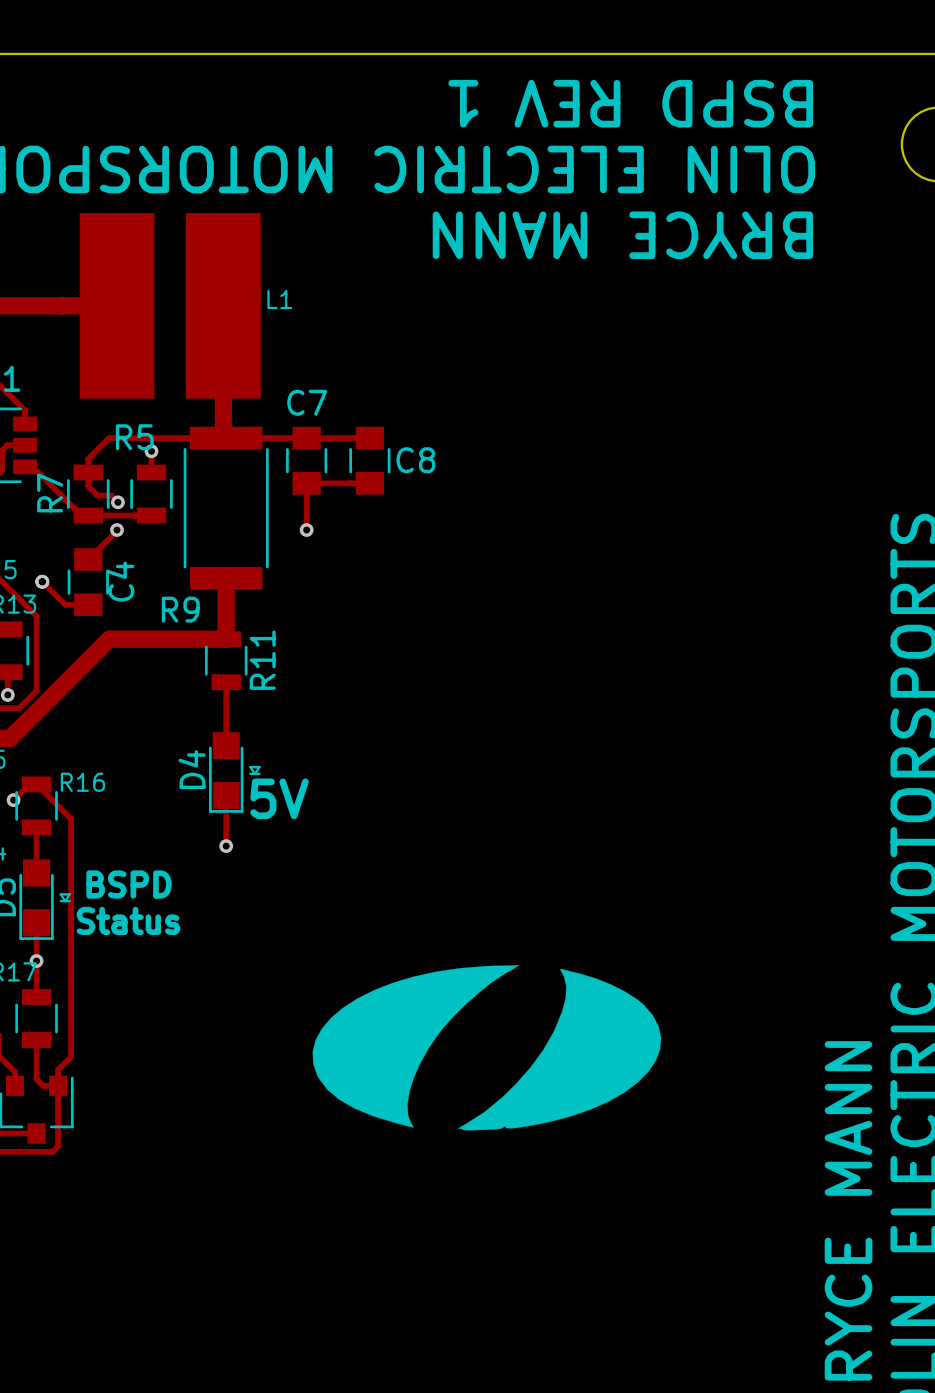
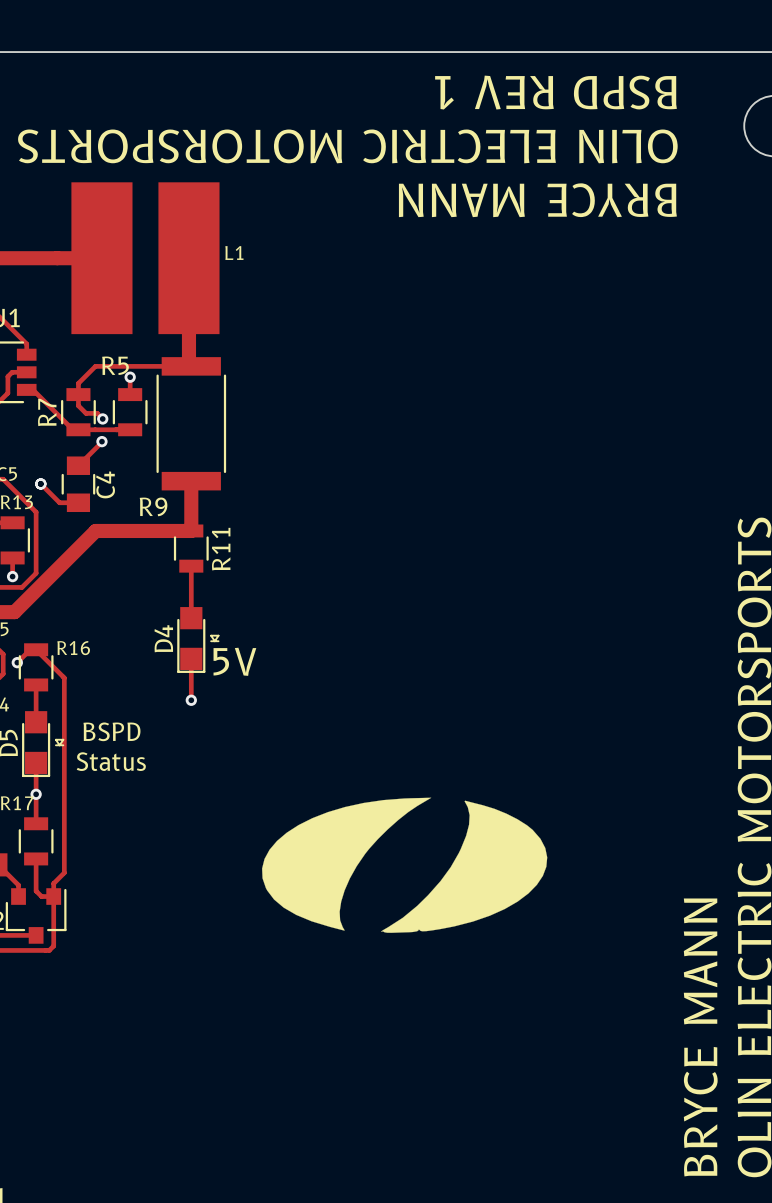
track: (226, 438) (369, 438) -> none
C7: (306, 460) -> none
C8: (369, 460) -> none
track: (369, 483) (306, 483) (306, 530) -> none
via: (306, 530) -> none

